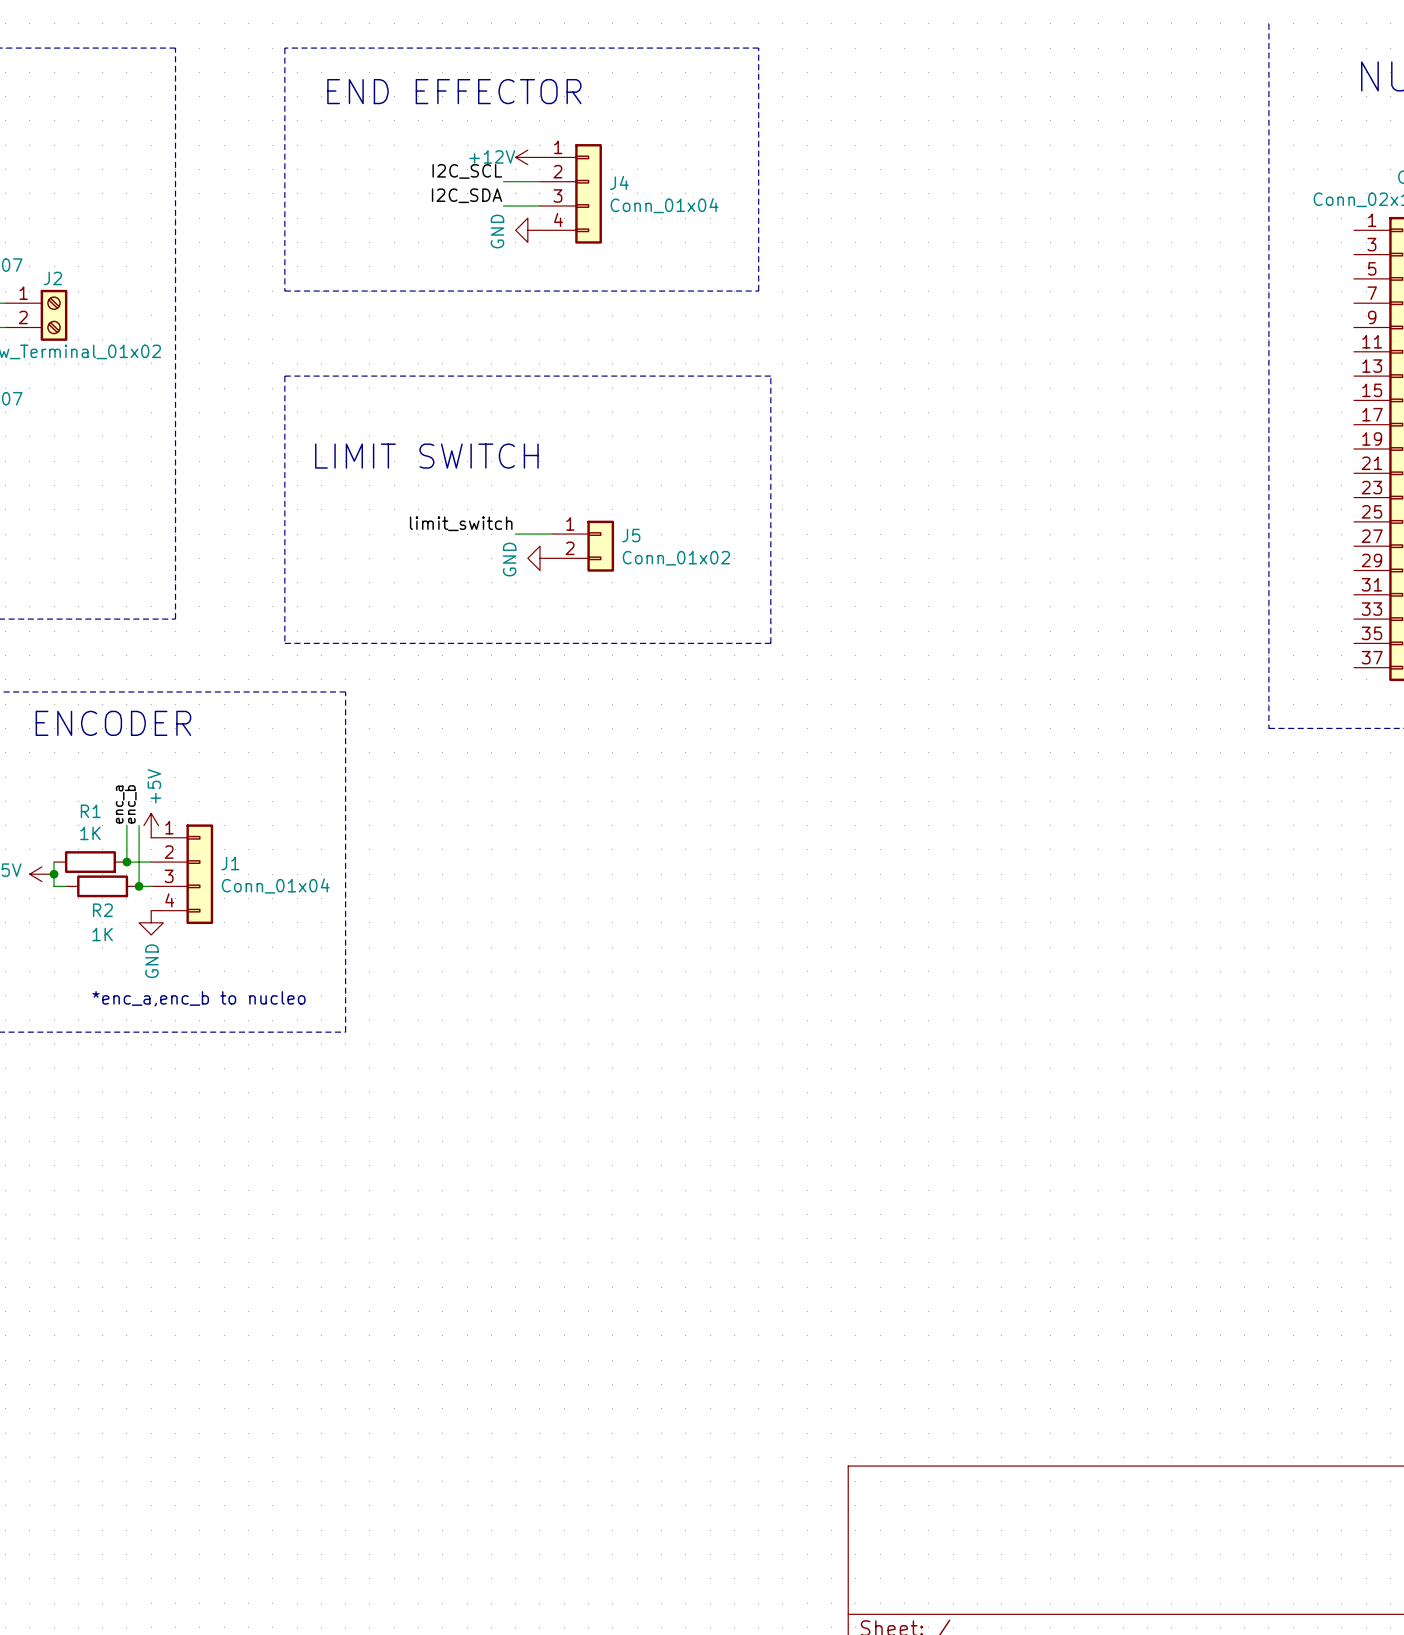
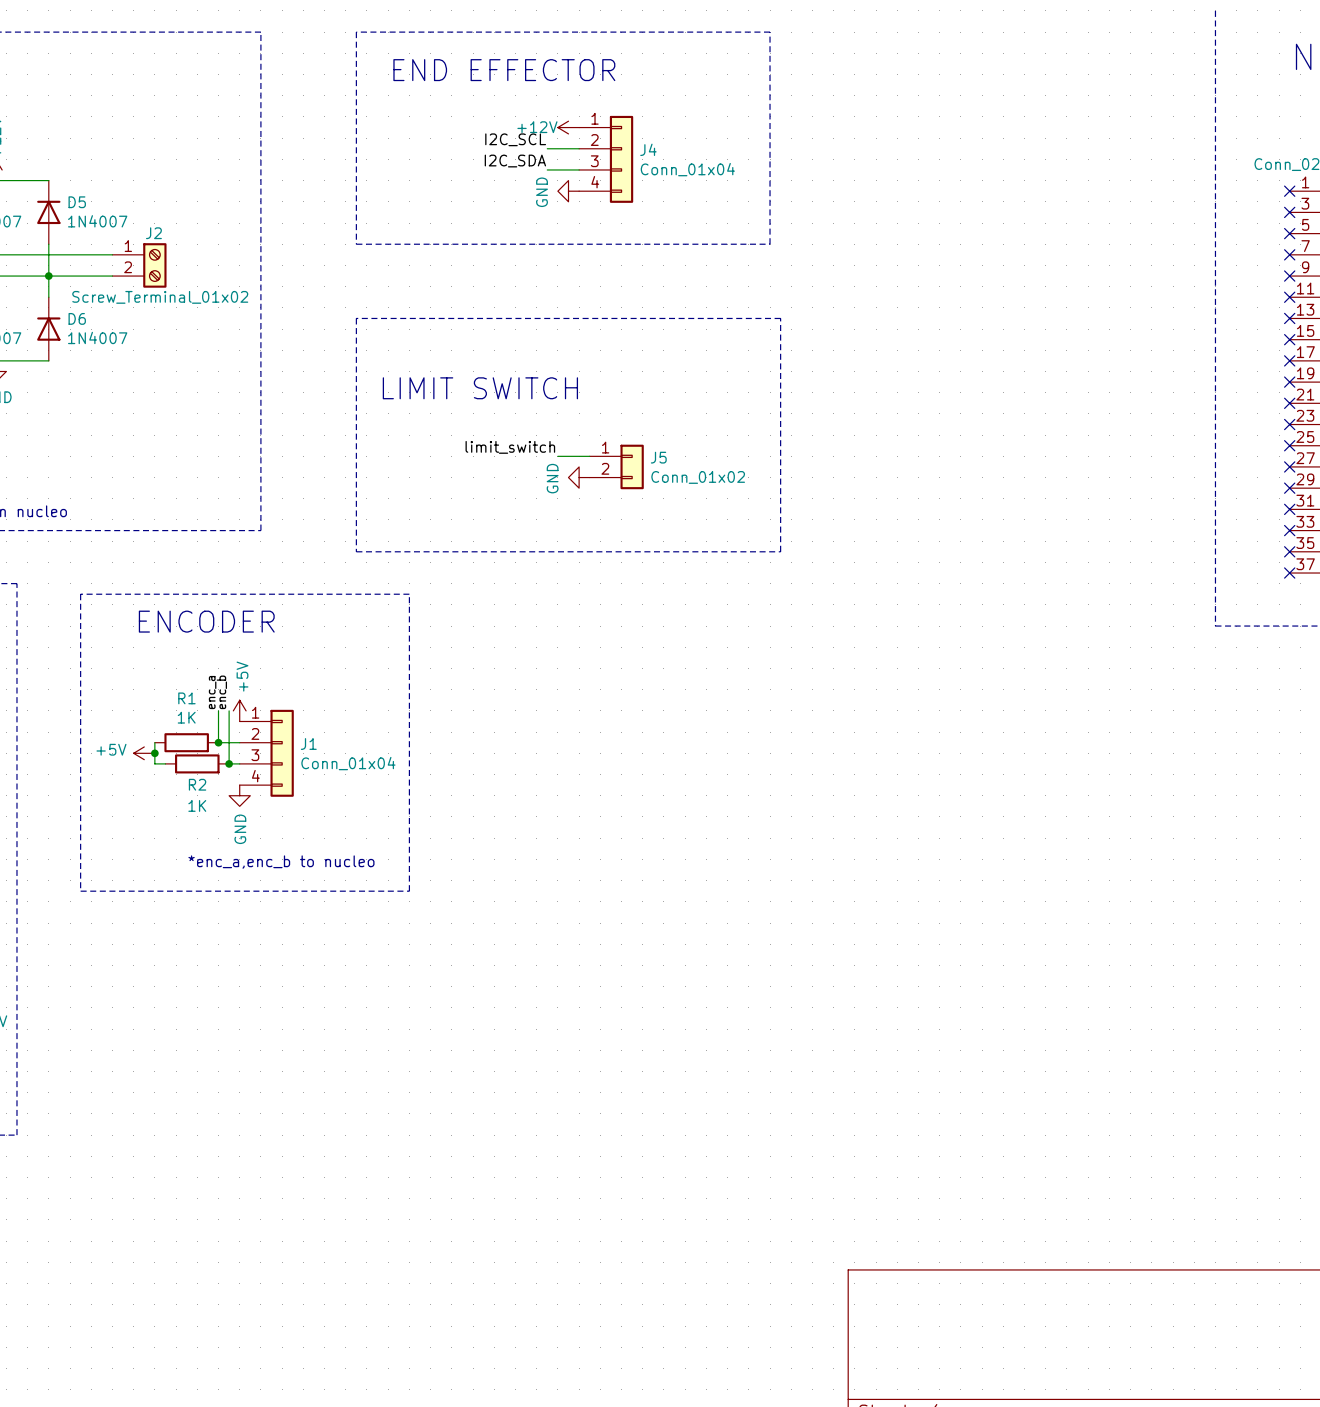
no-connect mark: none -> (1289, 191)
no-connect mark: none -> (1289, 212)
no-connect mark: none -> (1289, 233)
no-connect mark: none -> (1289, 254)
no-connect mark: none -> (1289, 276)
no-connect mark: none -> (1289, 297)
no-connect mark: none -> (1289, 318)
no-connect mark: none -> (1289, 339)
no-connect mark: none -> (1289, 360)
no-connect mark: none -> (1289, 382)
no-connect mark: none -> (1289, 403)
no-connect mark: none -> (1289, 424)
no-connect mark: none -> (1289, 445)
no-connect mark: none -> (1289, 466)
no-connect mark: none -> (1289, 488)
no-connect mark: none -> (1289, 509)
no-connect mark: none -> (1289, 530)
no-connect mark: none -> (1289, 551)
no-connect mark: none -> (1289, 573)

